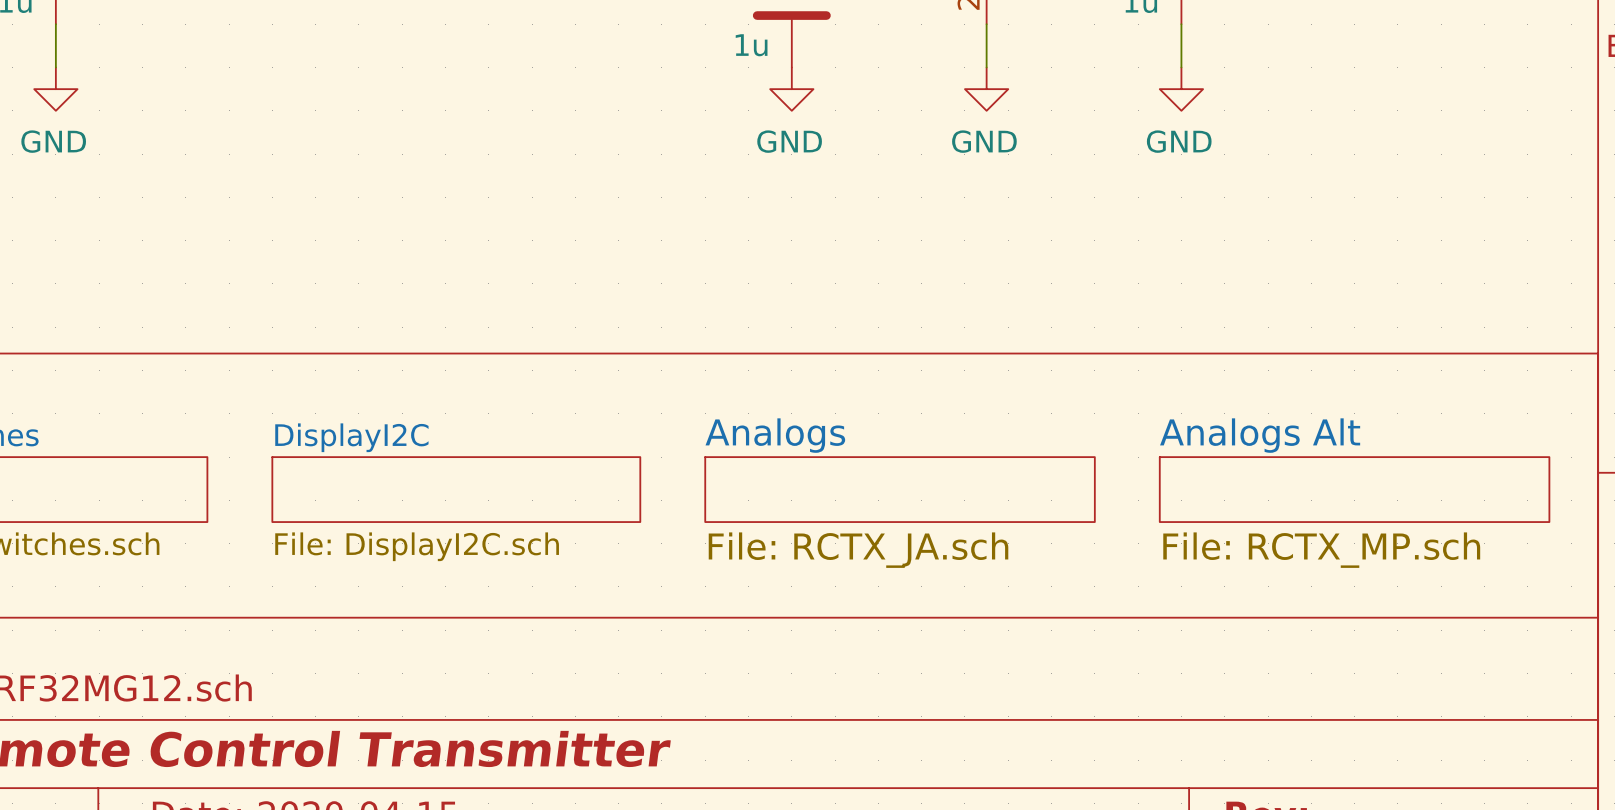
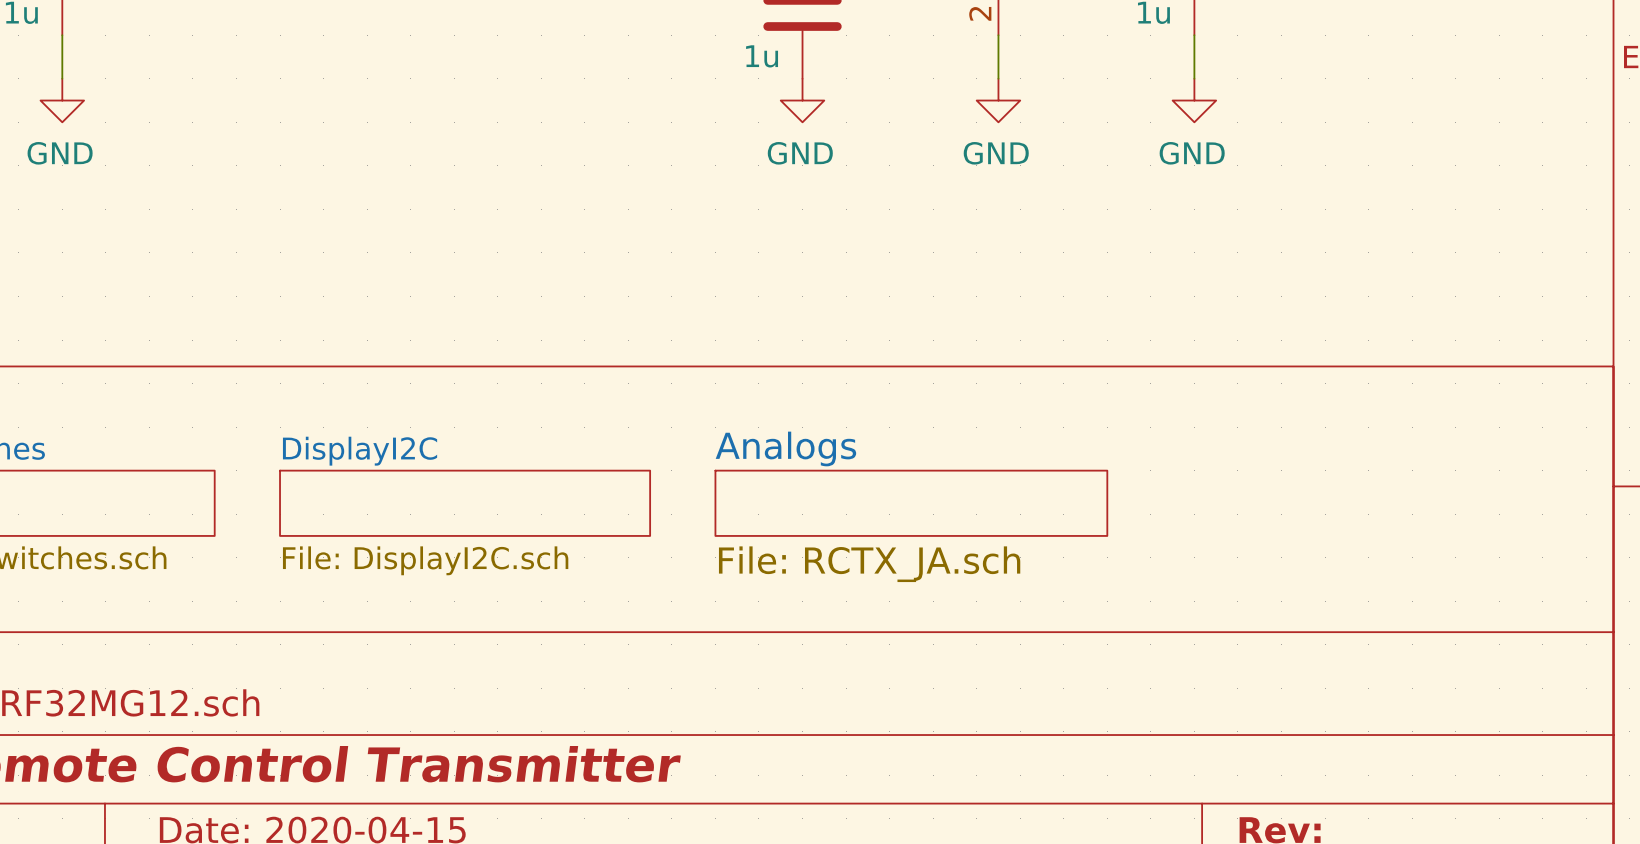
sheet Analogs Alt: File: RCTX_MP.sch (1354, 489) -> none

